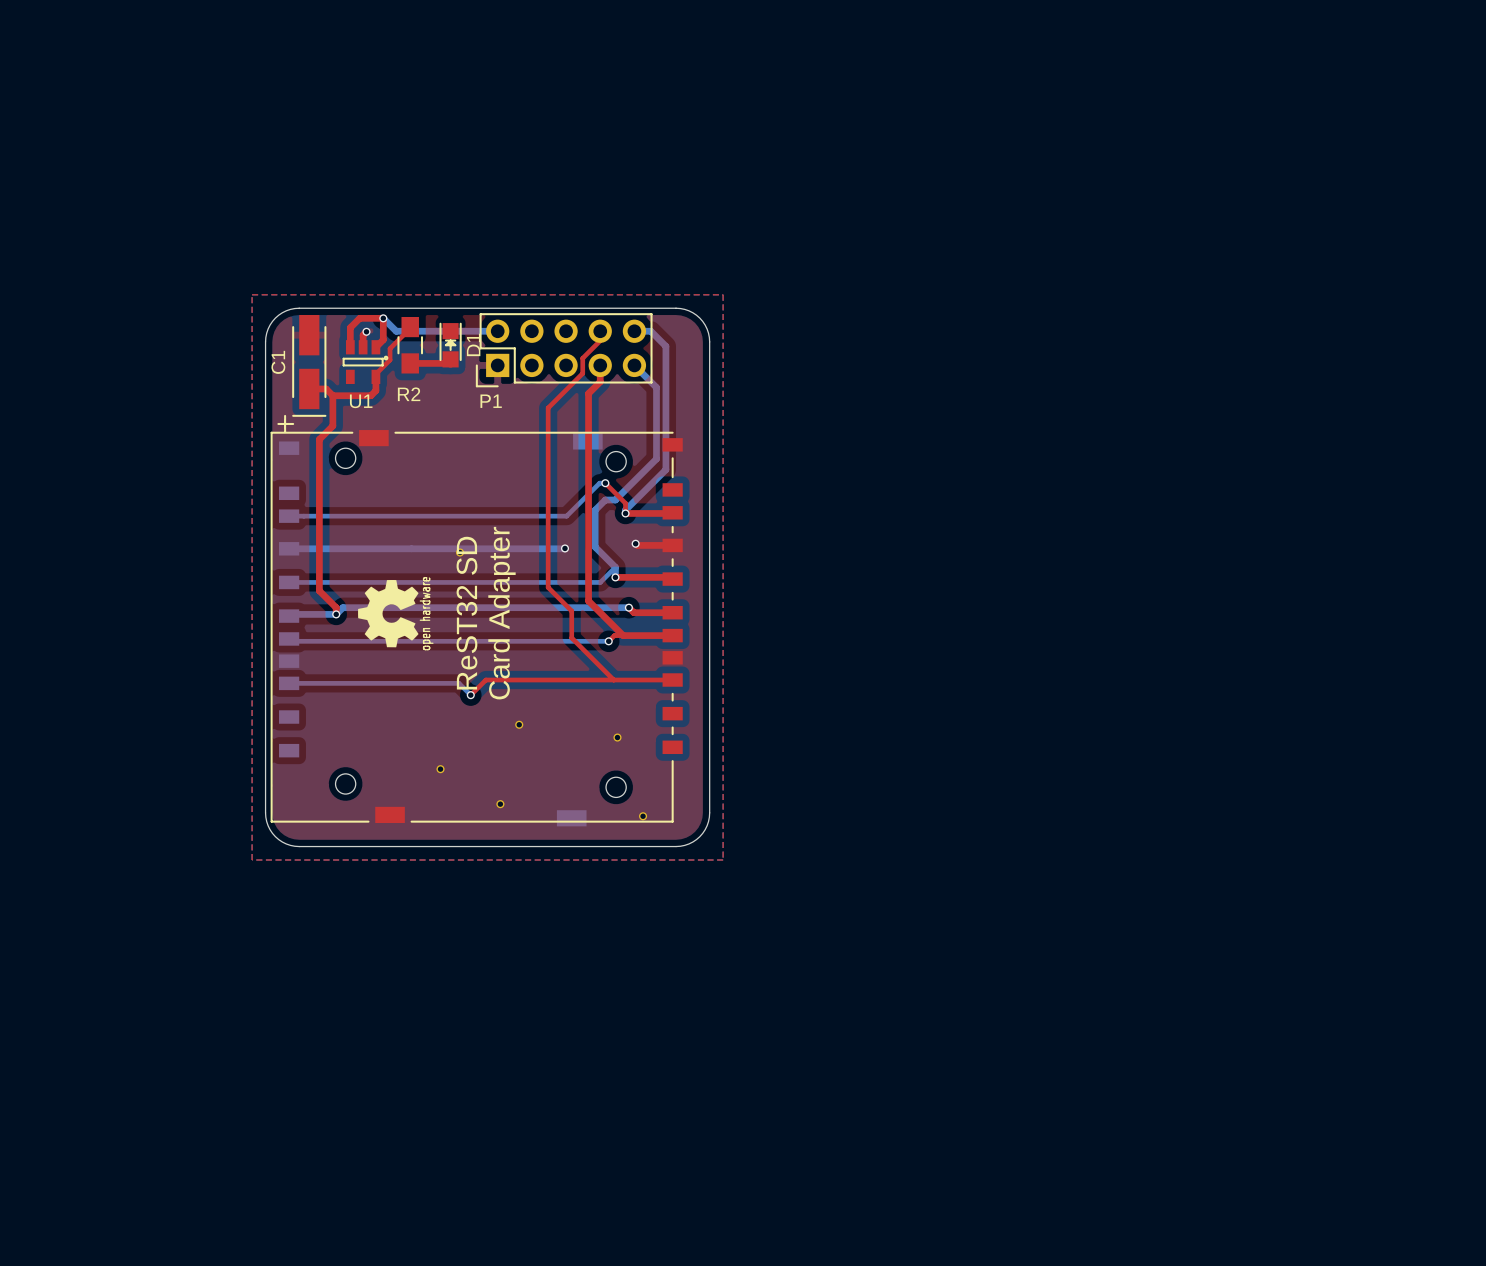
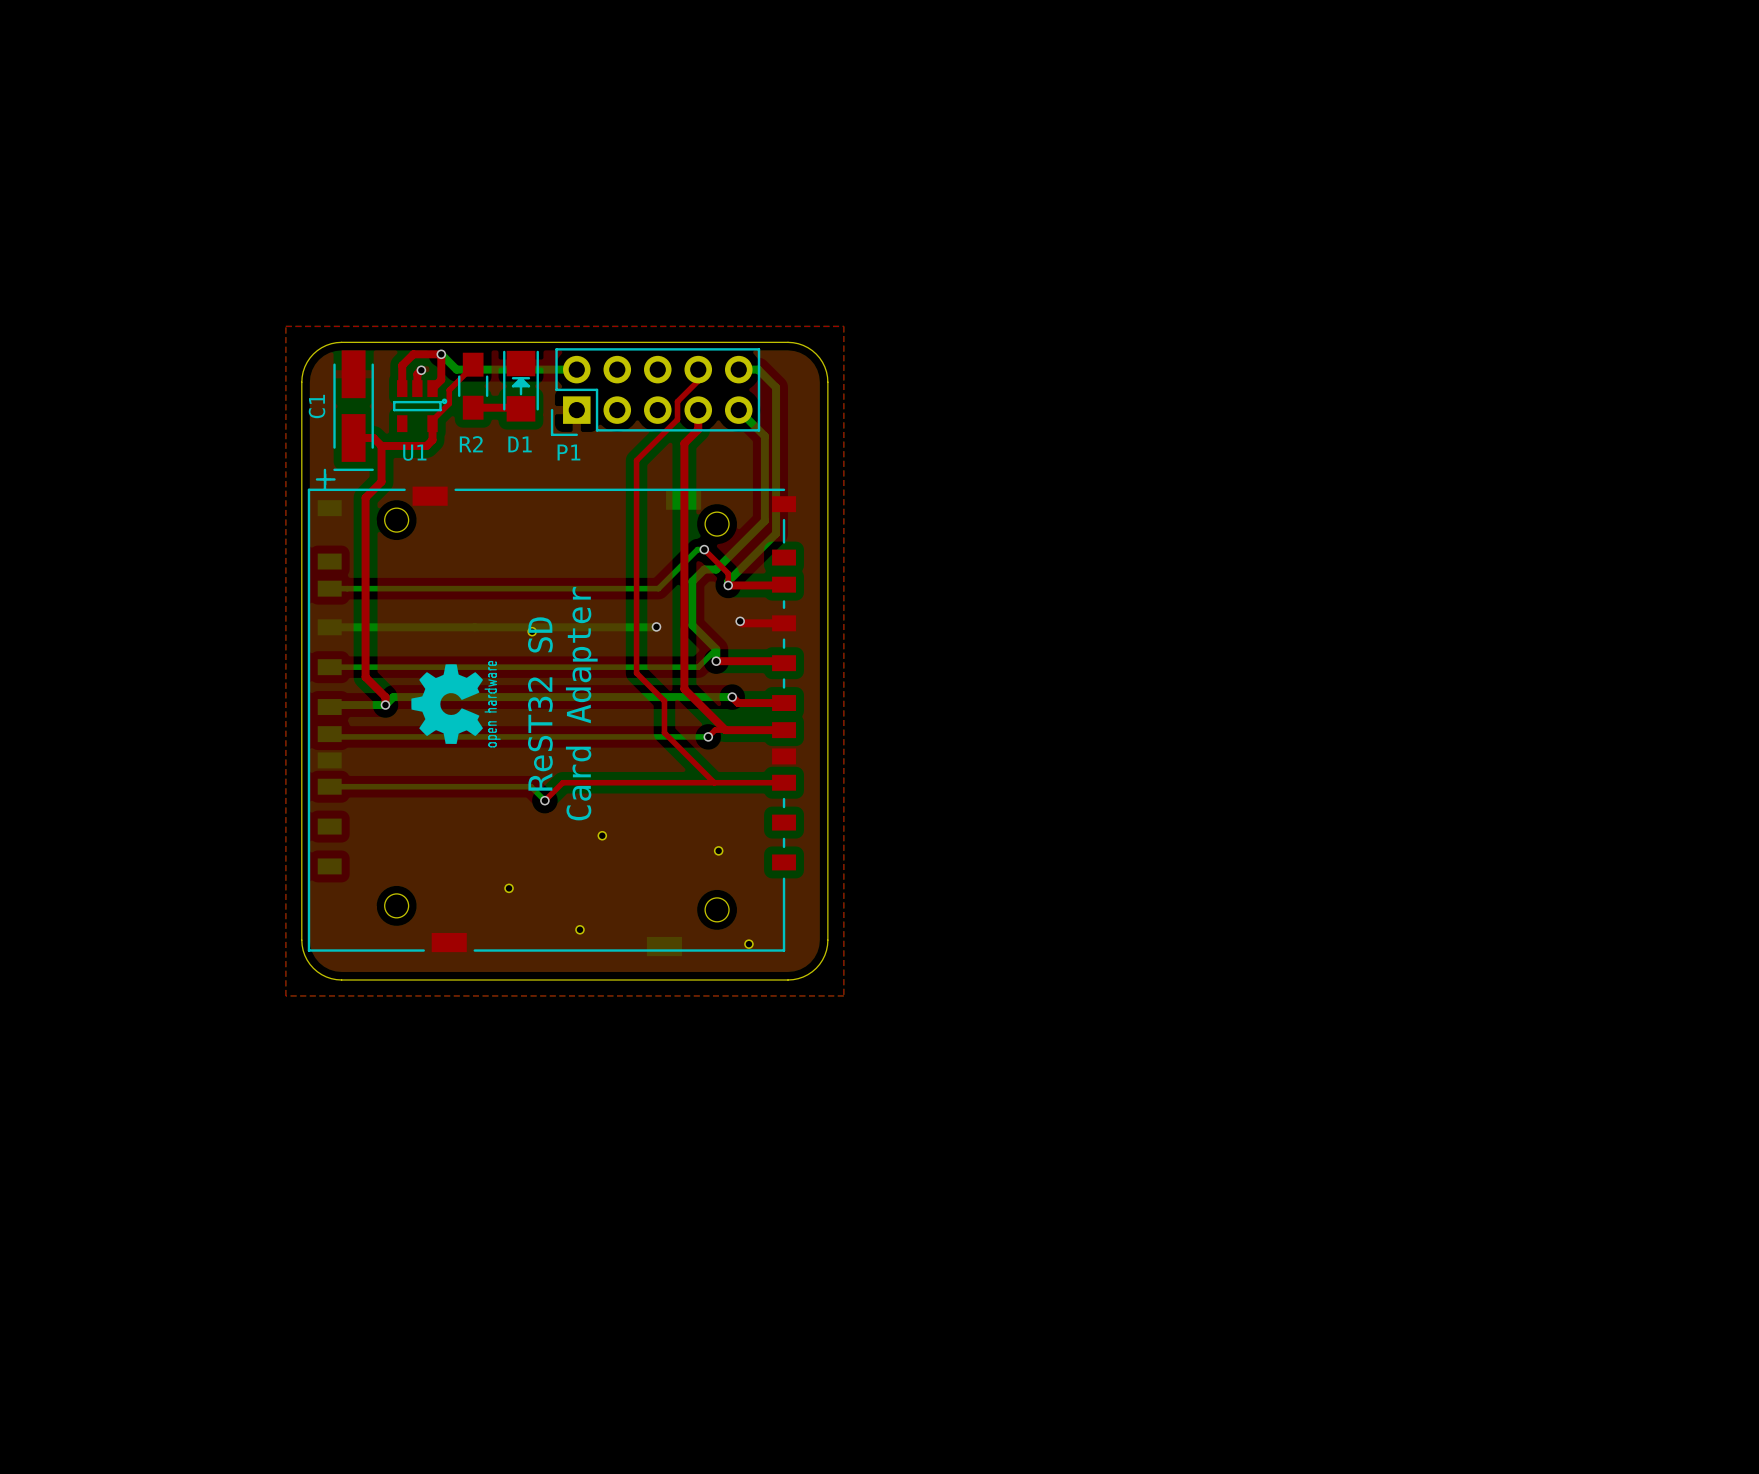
D1 footprint: [439, 322, 462, 368] -> [503, 350, 539, 422]
D1 name rotation: 0° (473, 344) -> 90° clockwise (520, 444)
D1 name position: D1 (473, 344) -> D1 (520, 444)

